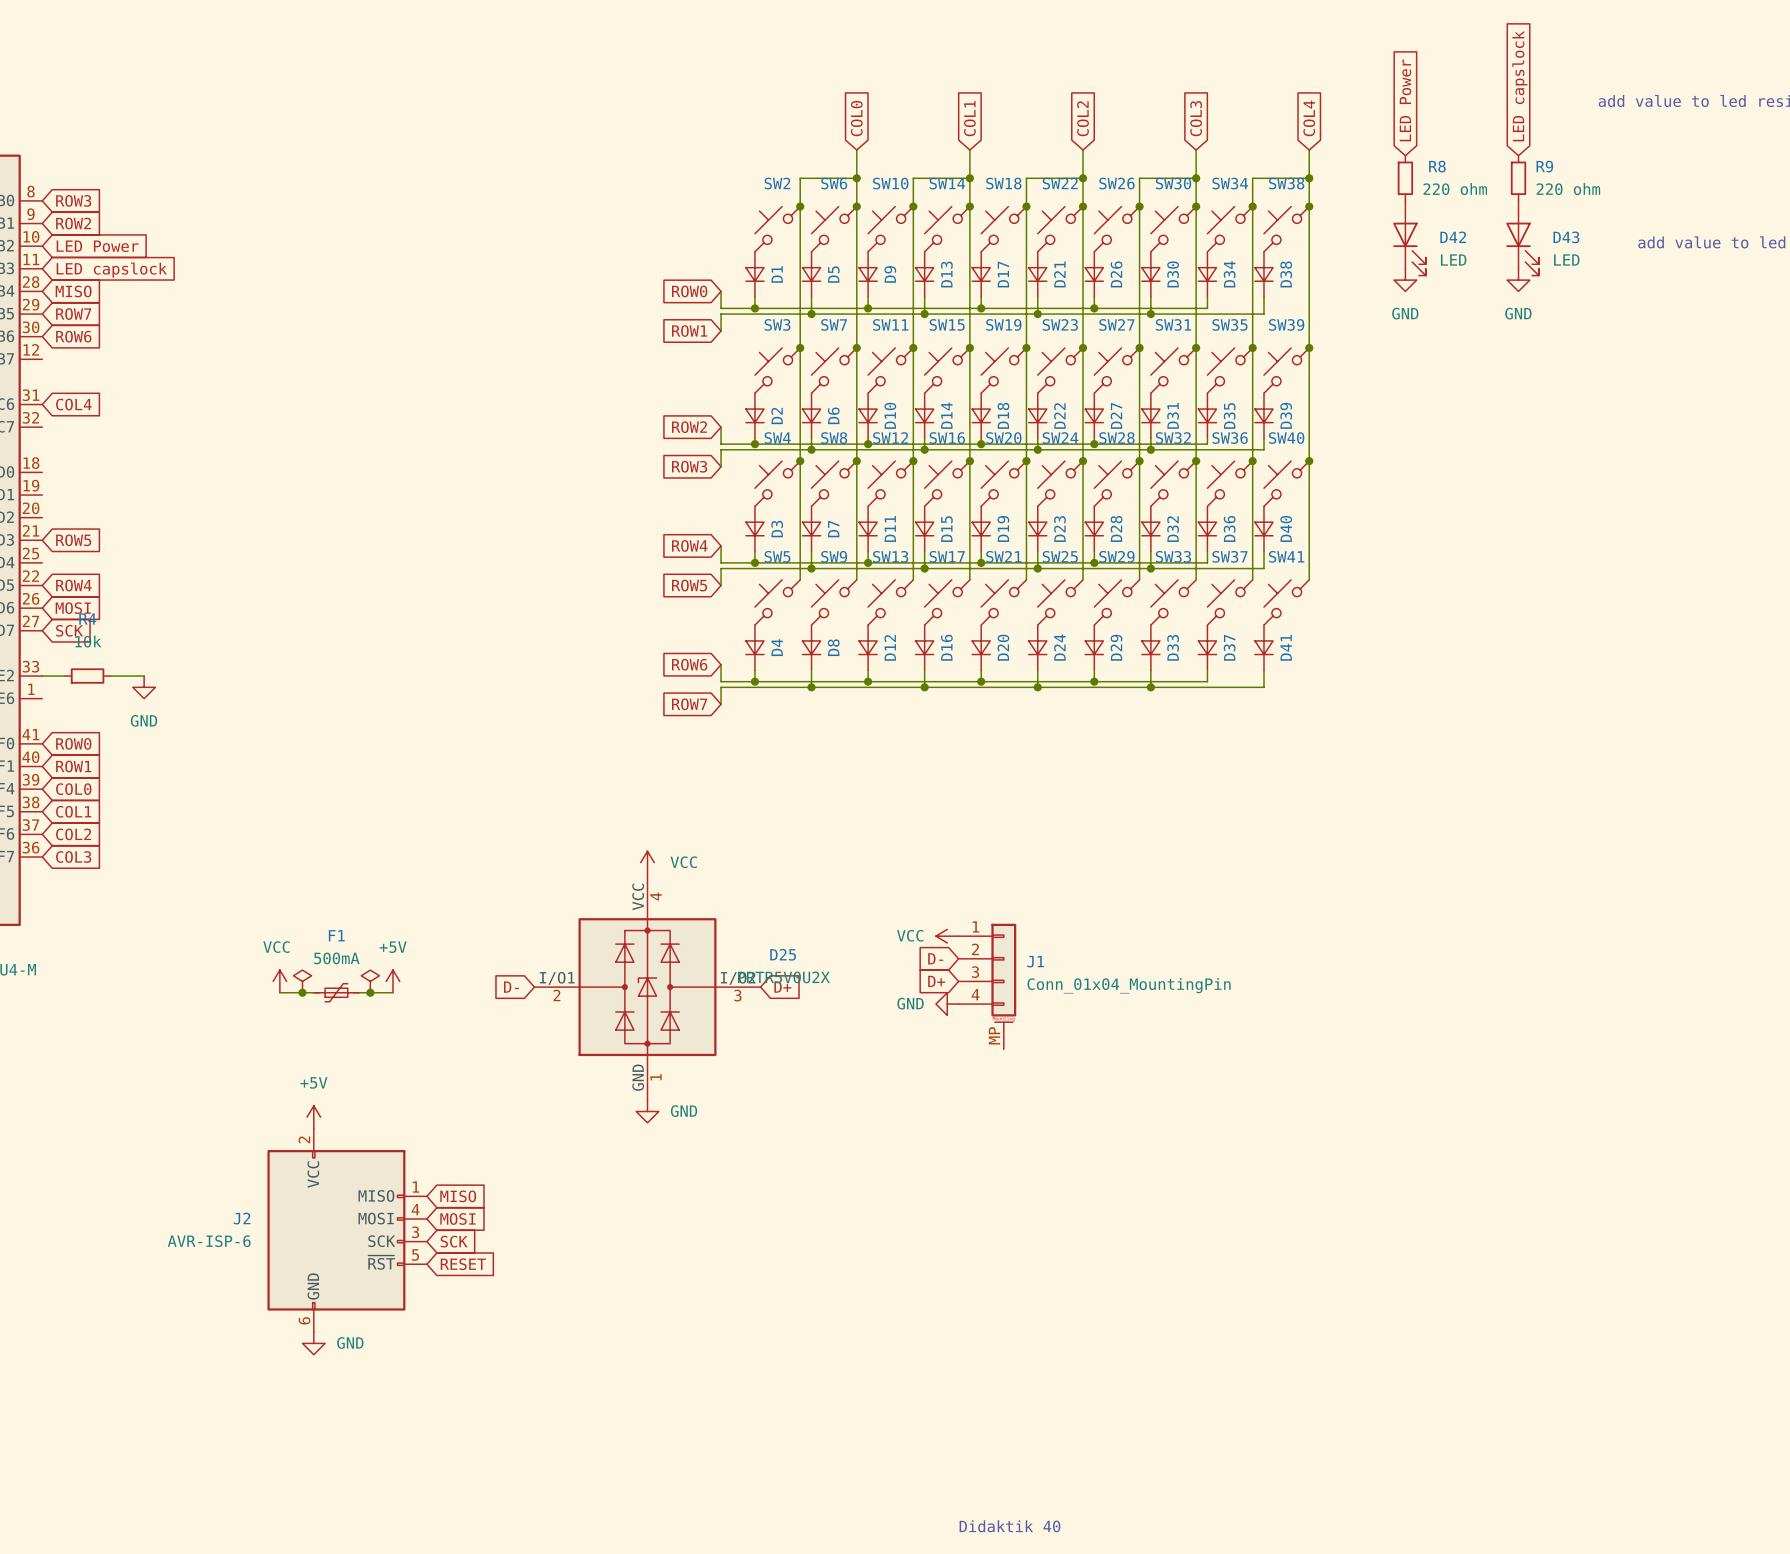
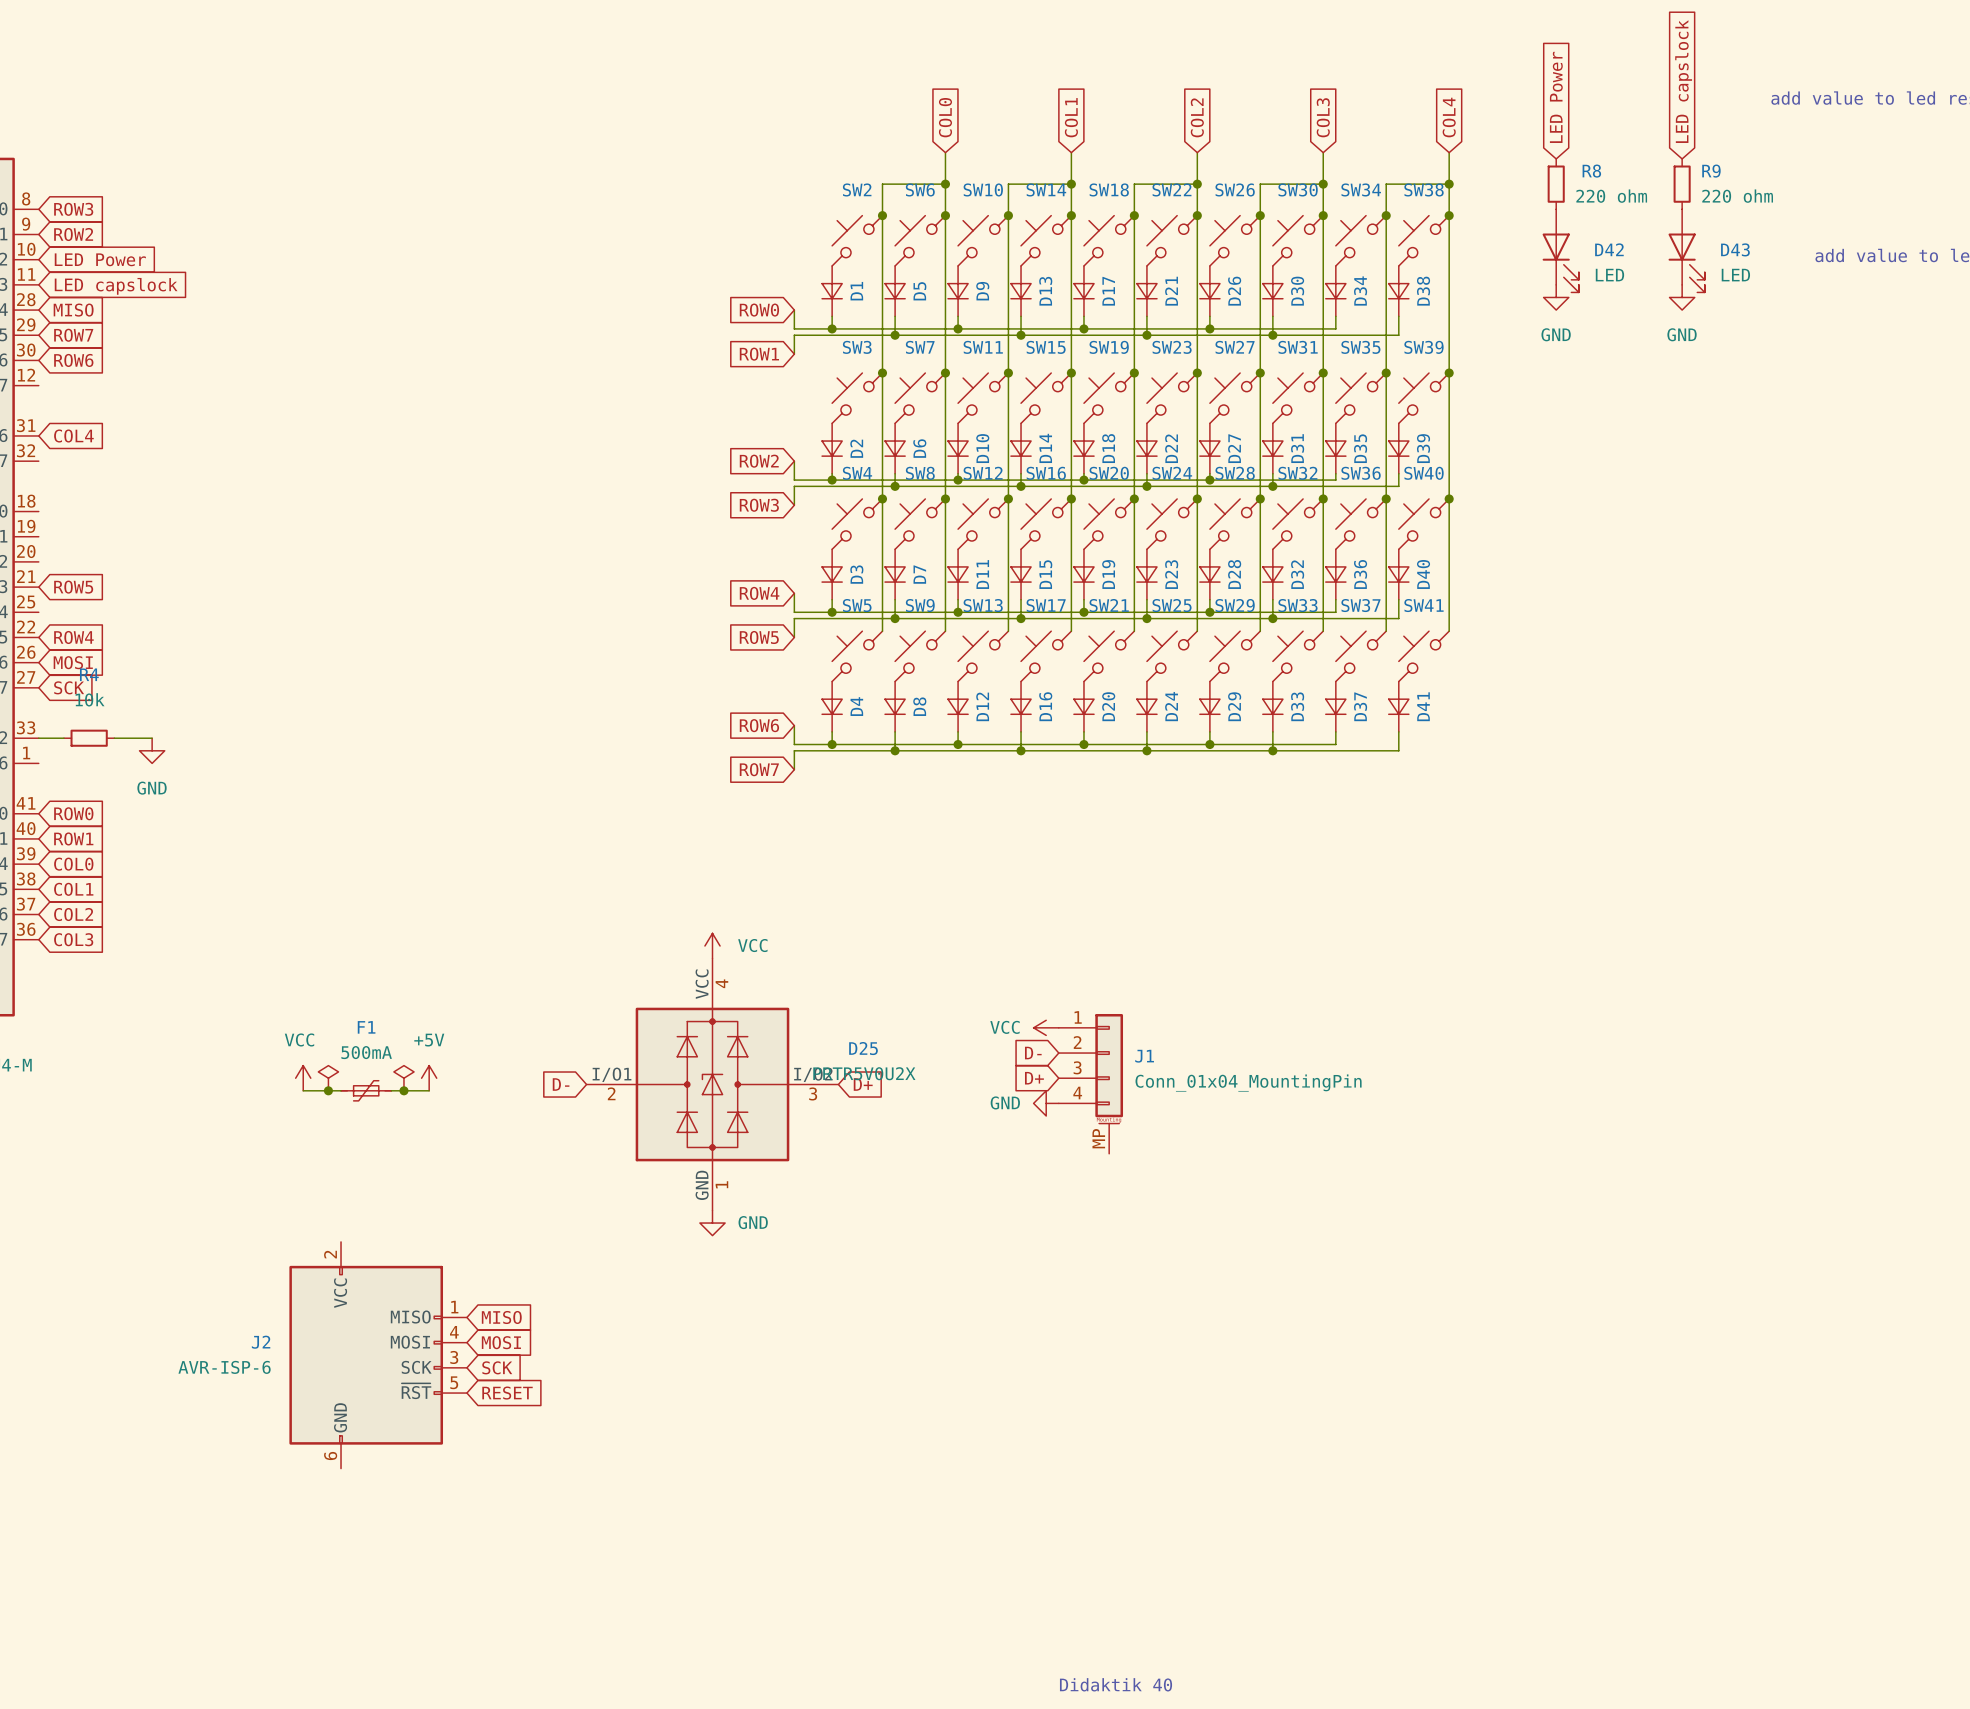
power symbol: +5V (313, 1117) -> none
power symbol: GND (313, 1343) -> none

